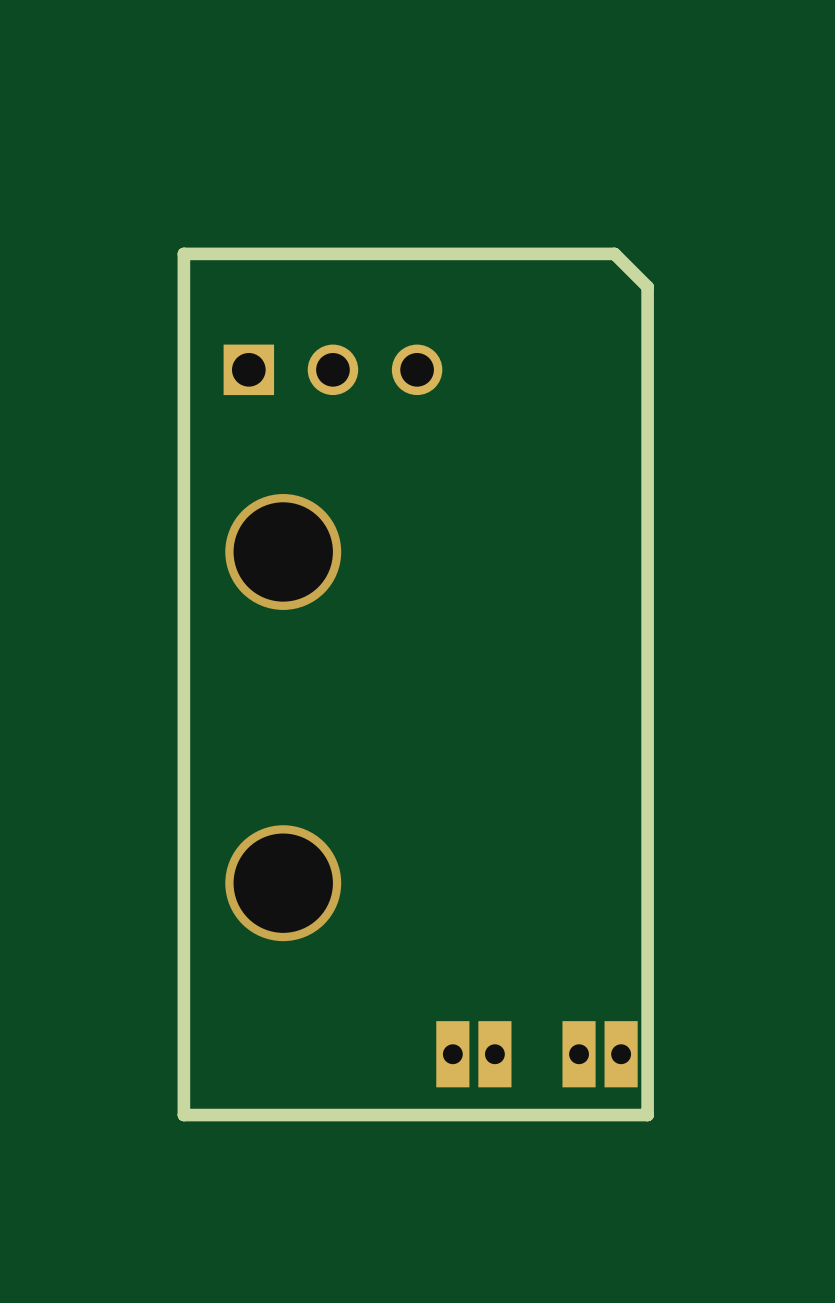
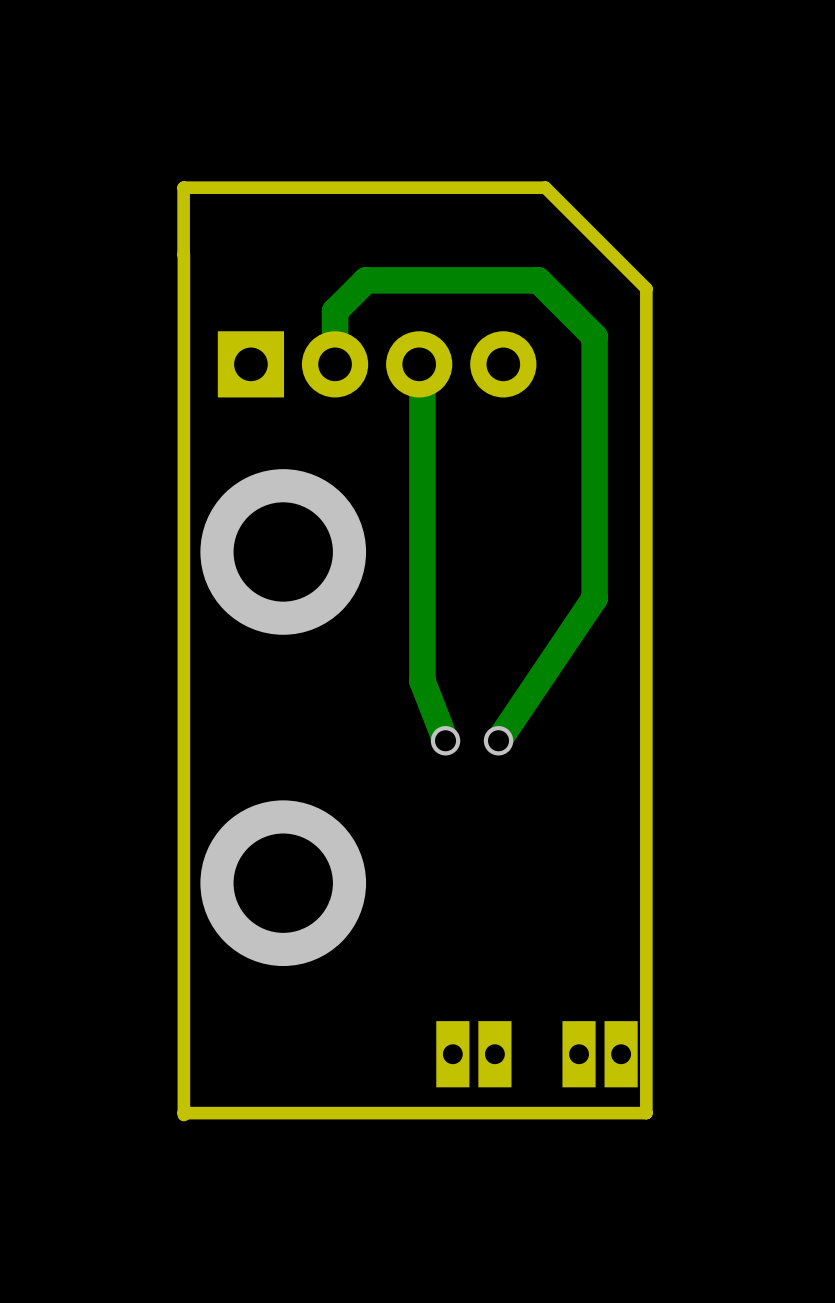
board edge: (183, 253) (614, 253) (647, 286) (647, 1115) (183, 1115) -> (183, 254) (183, 187) (545, 187) (646, 288) (646, 1113) (183, 1113)
track: none -> (335, 364) (335, 311) (366, 280) (538, 280) (594, 336) (594, 598) (498, 740)
part: none -> (377, 364)
track: none -> (419, 364) (422, 367) (422, 681) (445, 740)
part: (332, 369) -> none
via size: [225, 494, 342, 610] -> [200, 469, 367, 635]
via: none -> (445, 740)
via: none -> (498, 740)
via size: [225, 825, 342, 942] -> [200, 800, 367, 967]

